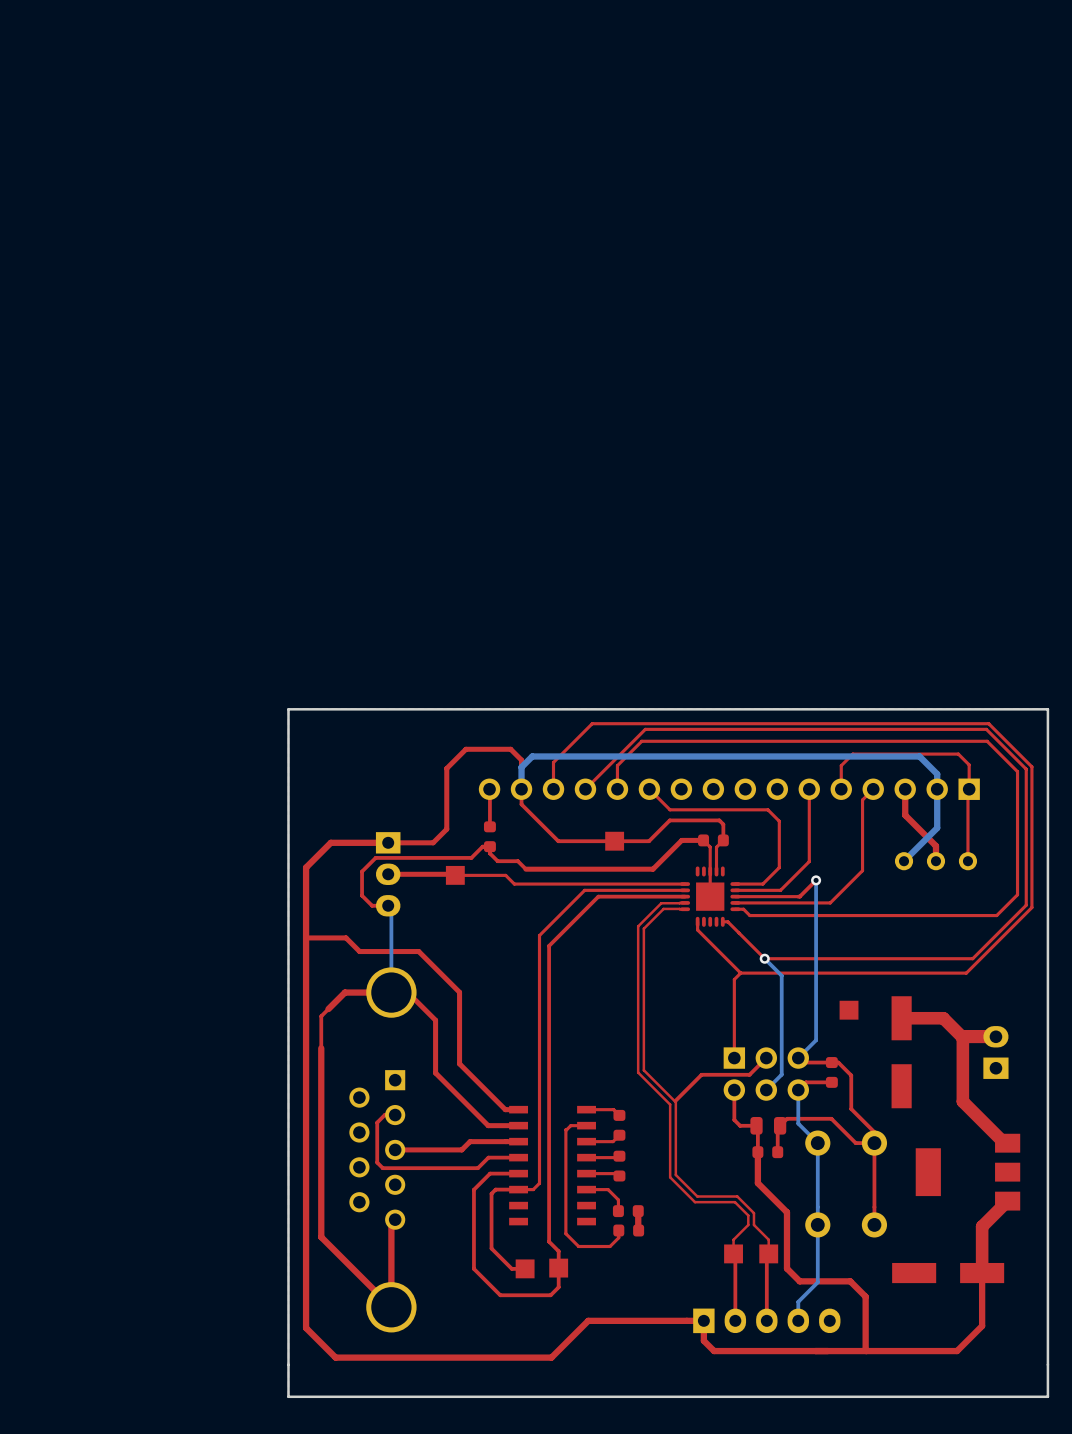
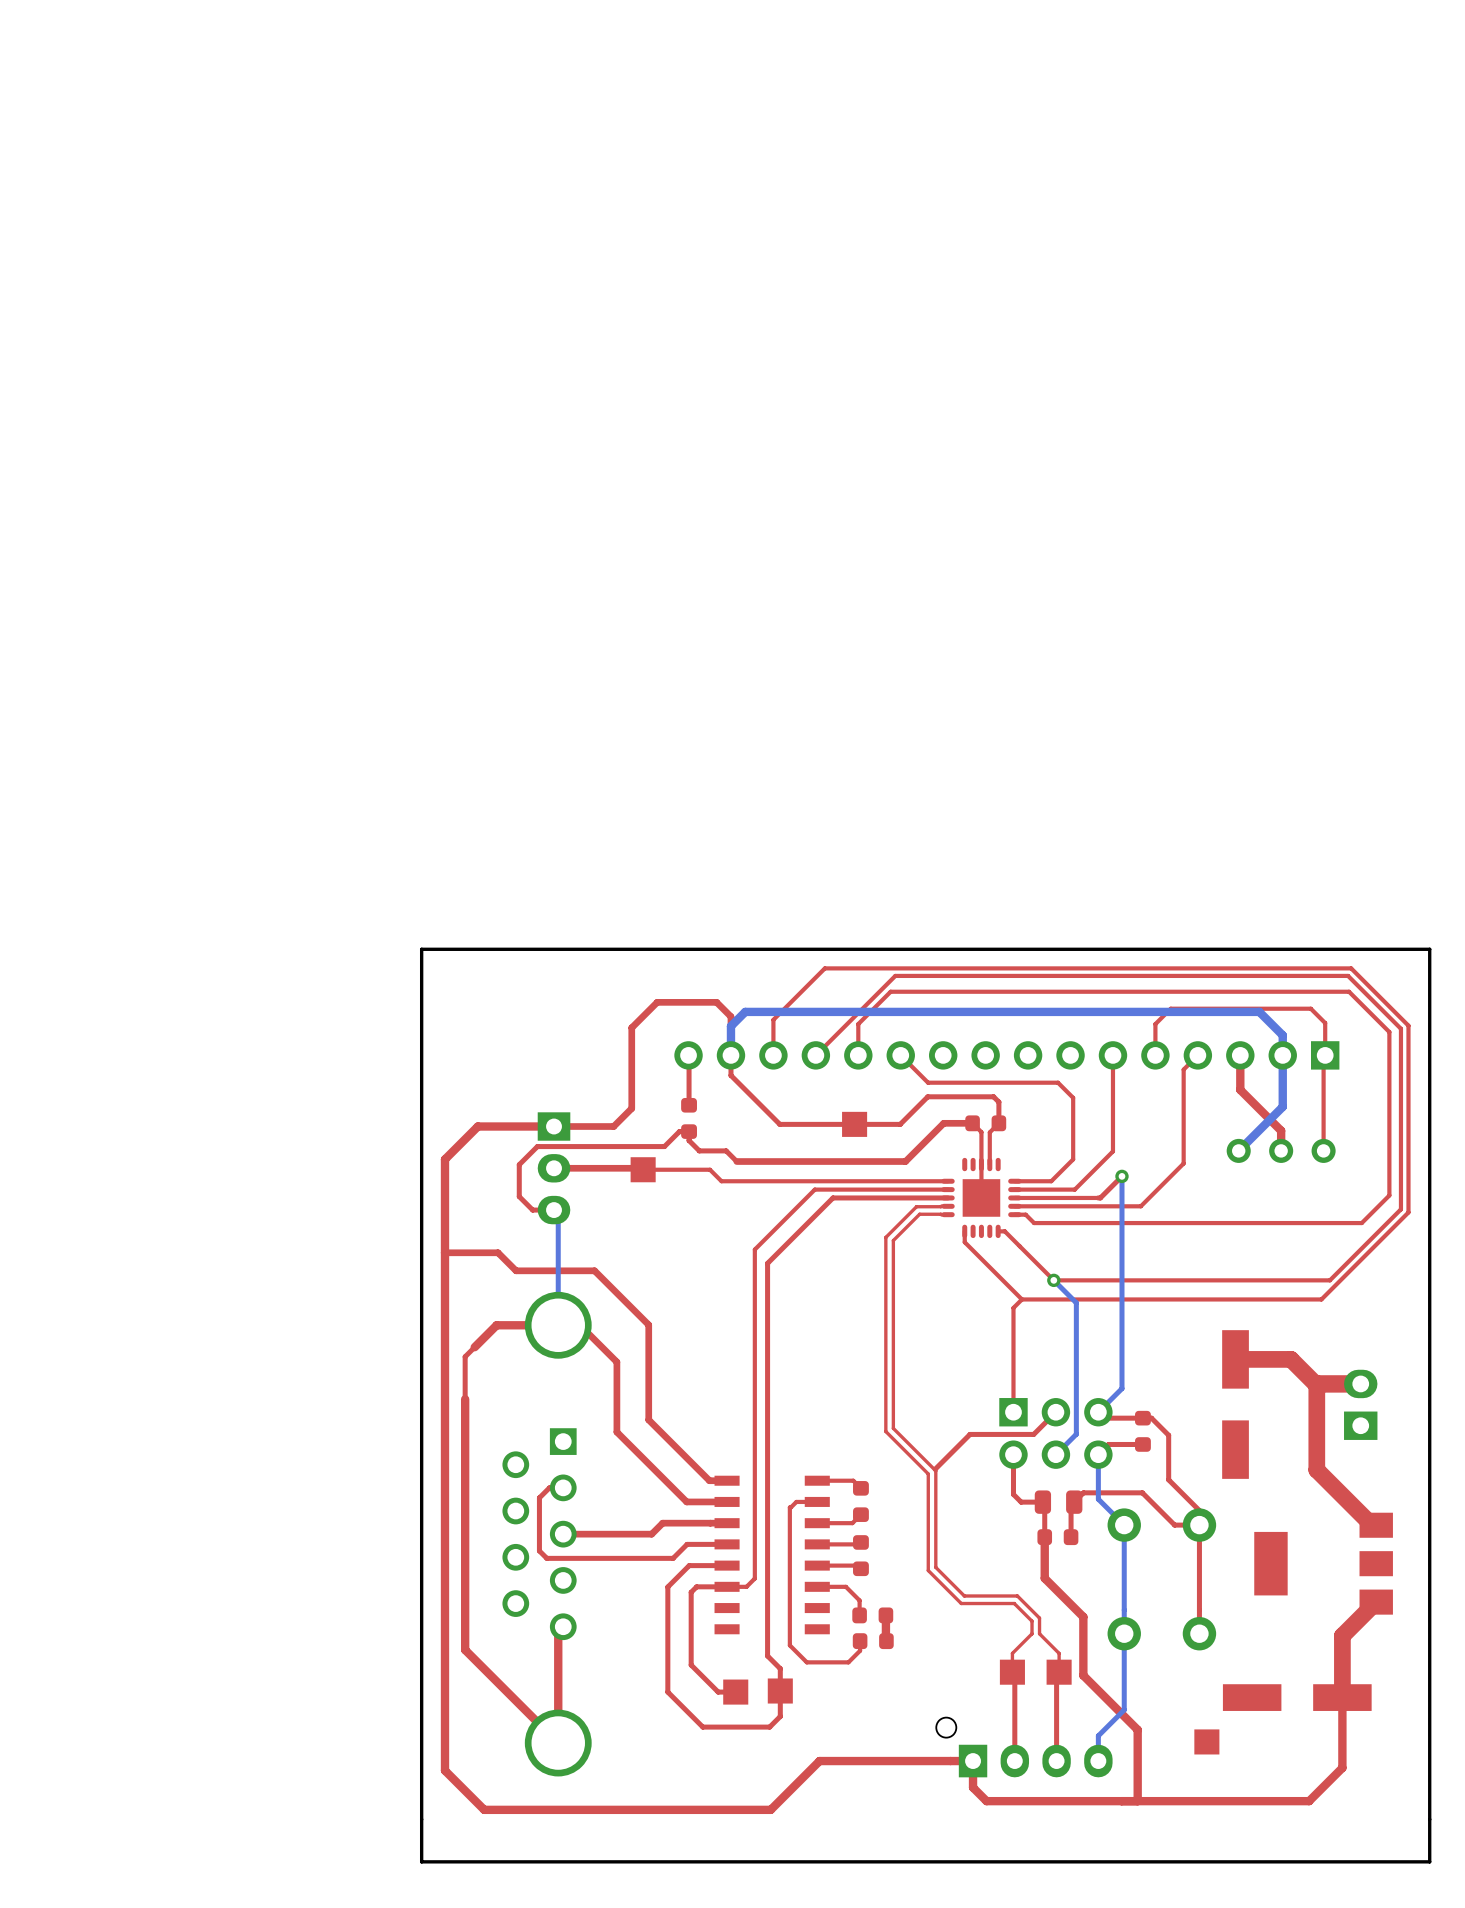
part position: (849, 1010) -> (1206, 1741)
top track: (786, 1256) (786, 1268) (799, 1281) (850, 1281) (865, 1296) (866, 1351) -> (1083, 1675) (1137, 1729) (1137, 1801)
part: none -> (1024, 1747)
part: (766, 1320) -> none

